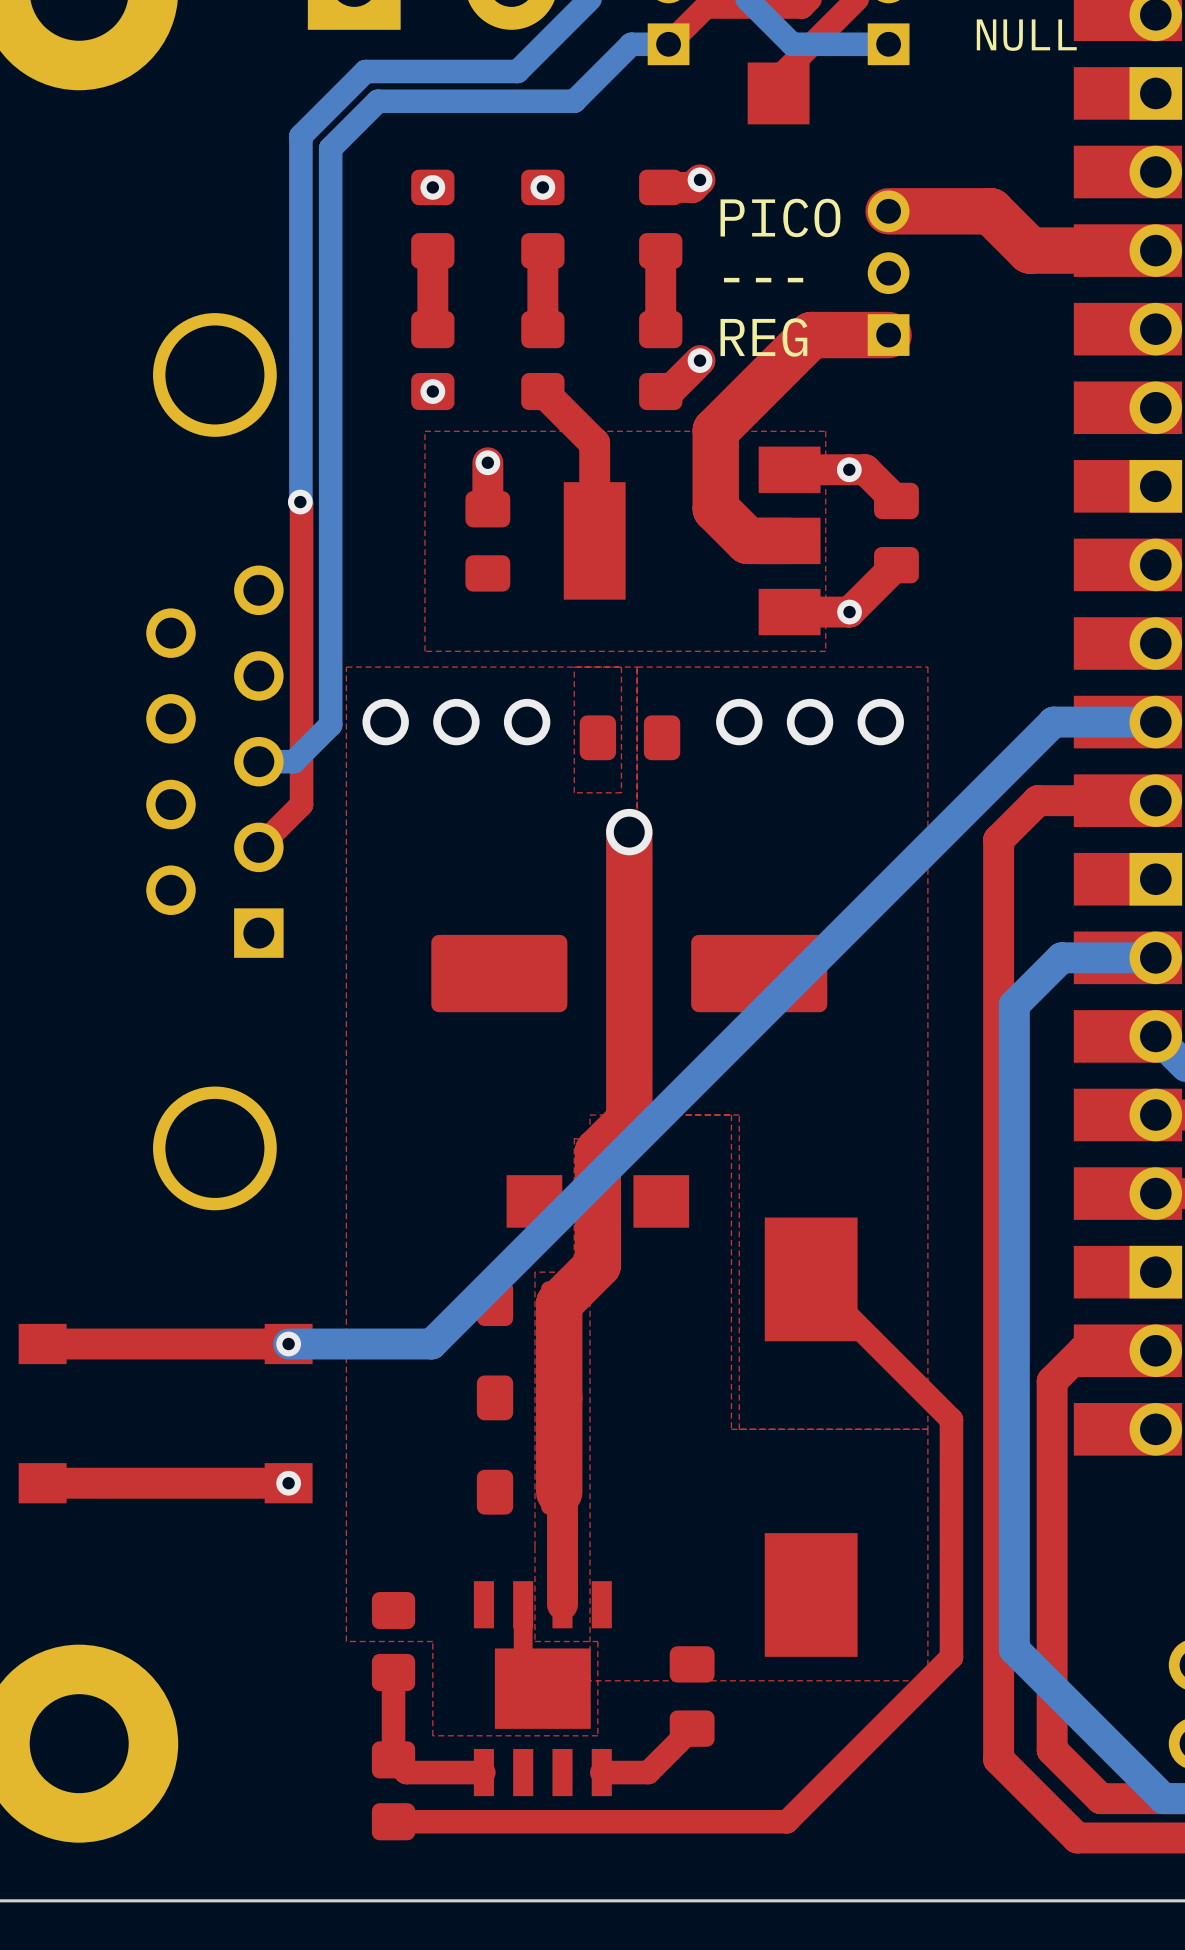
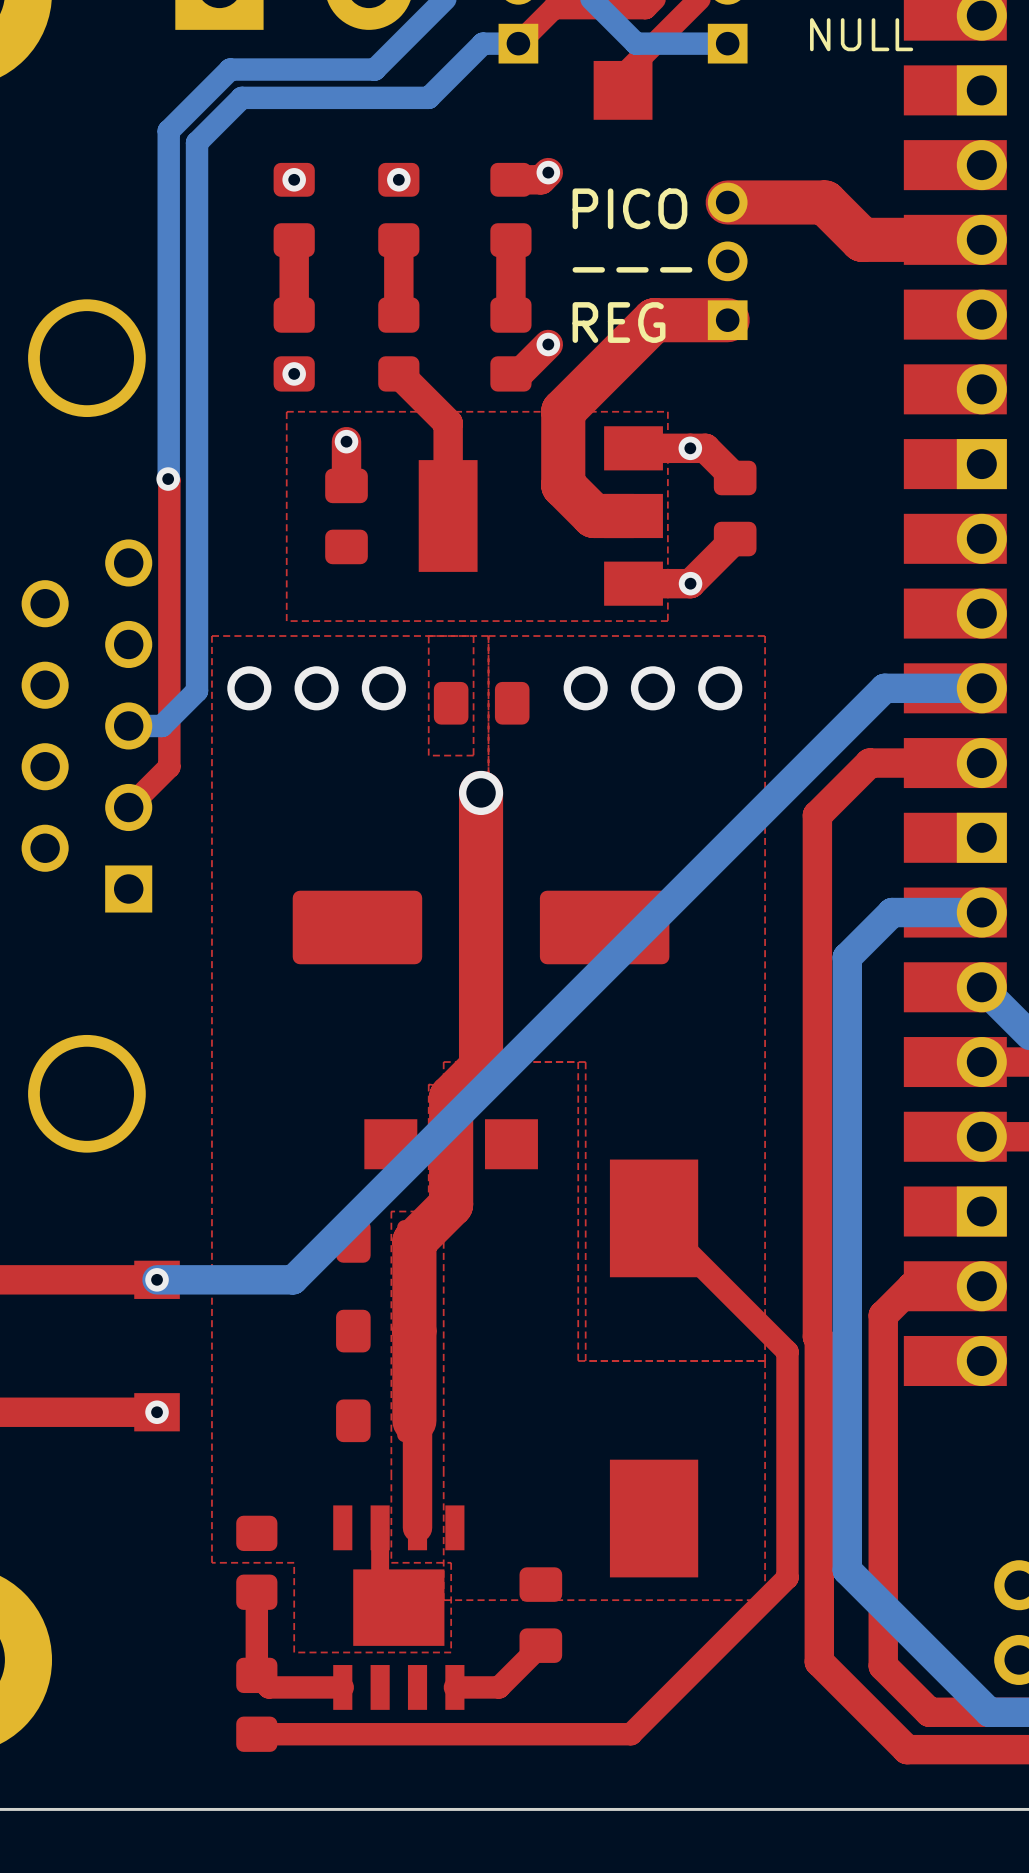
top track: (998, 839) (998, 1759) -> (832, 800) (817, 815) (819, 1661) (832, 1674)

